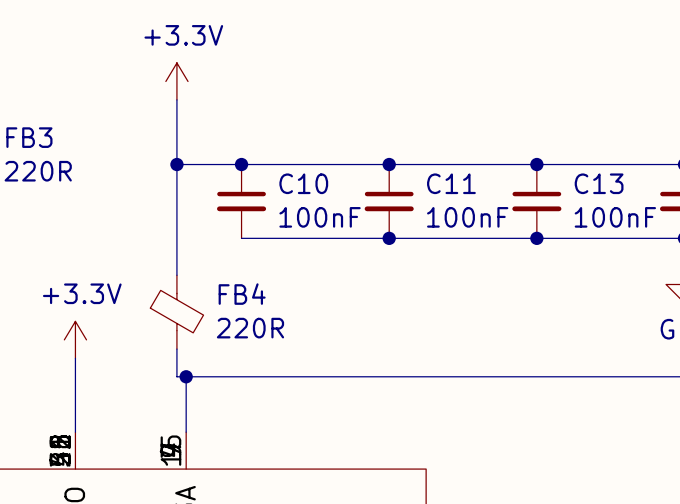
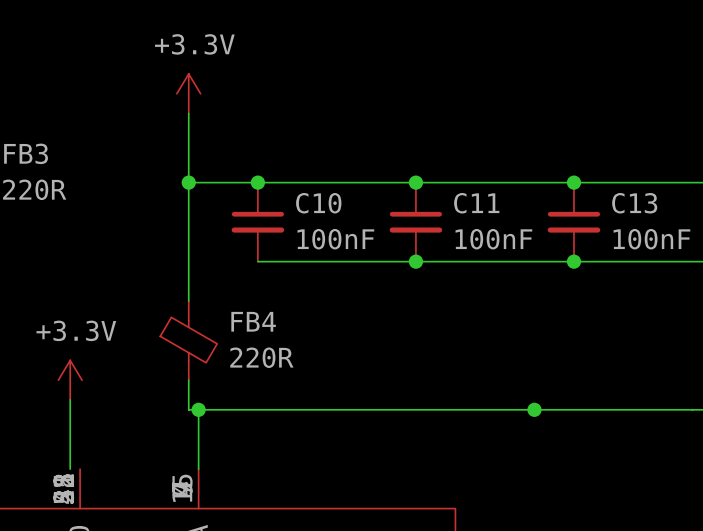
power symbol position: +3.3V (75, 339) -> +3.3V (70, 380)
wire: (75, 358) (75, 432) -> none
wire: none -> (70, 399) (70, 469)
junction: none -> (534, 409)

